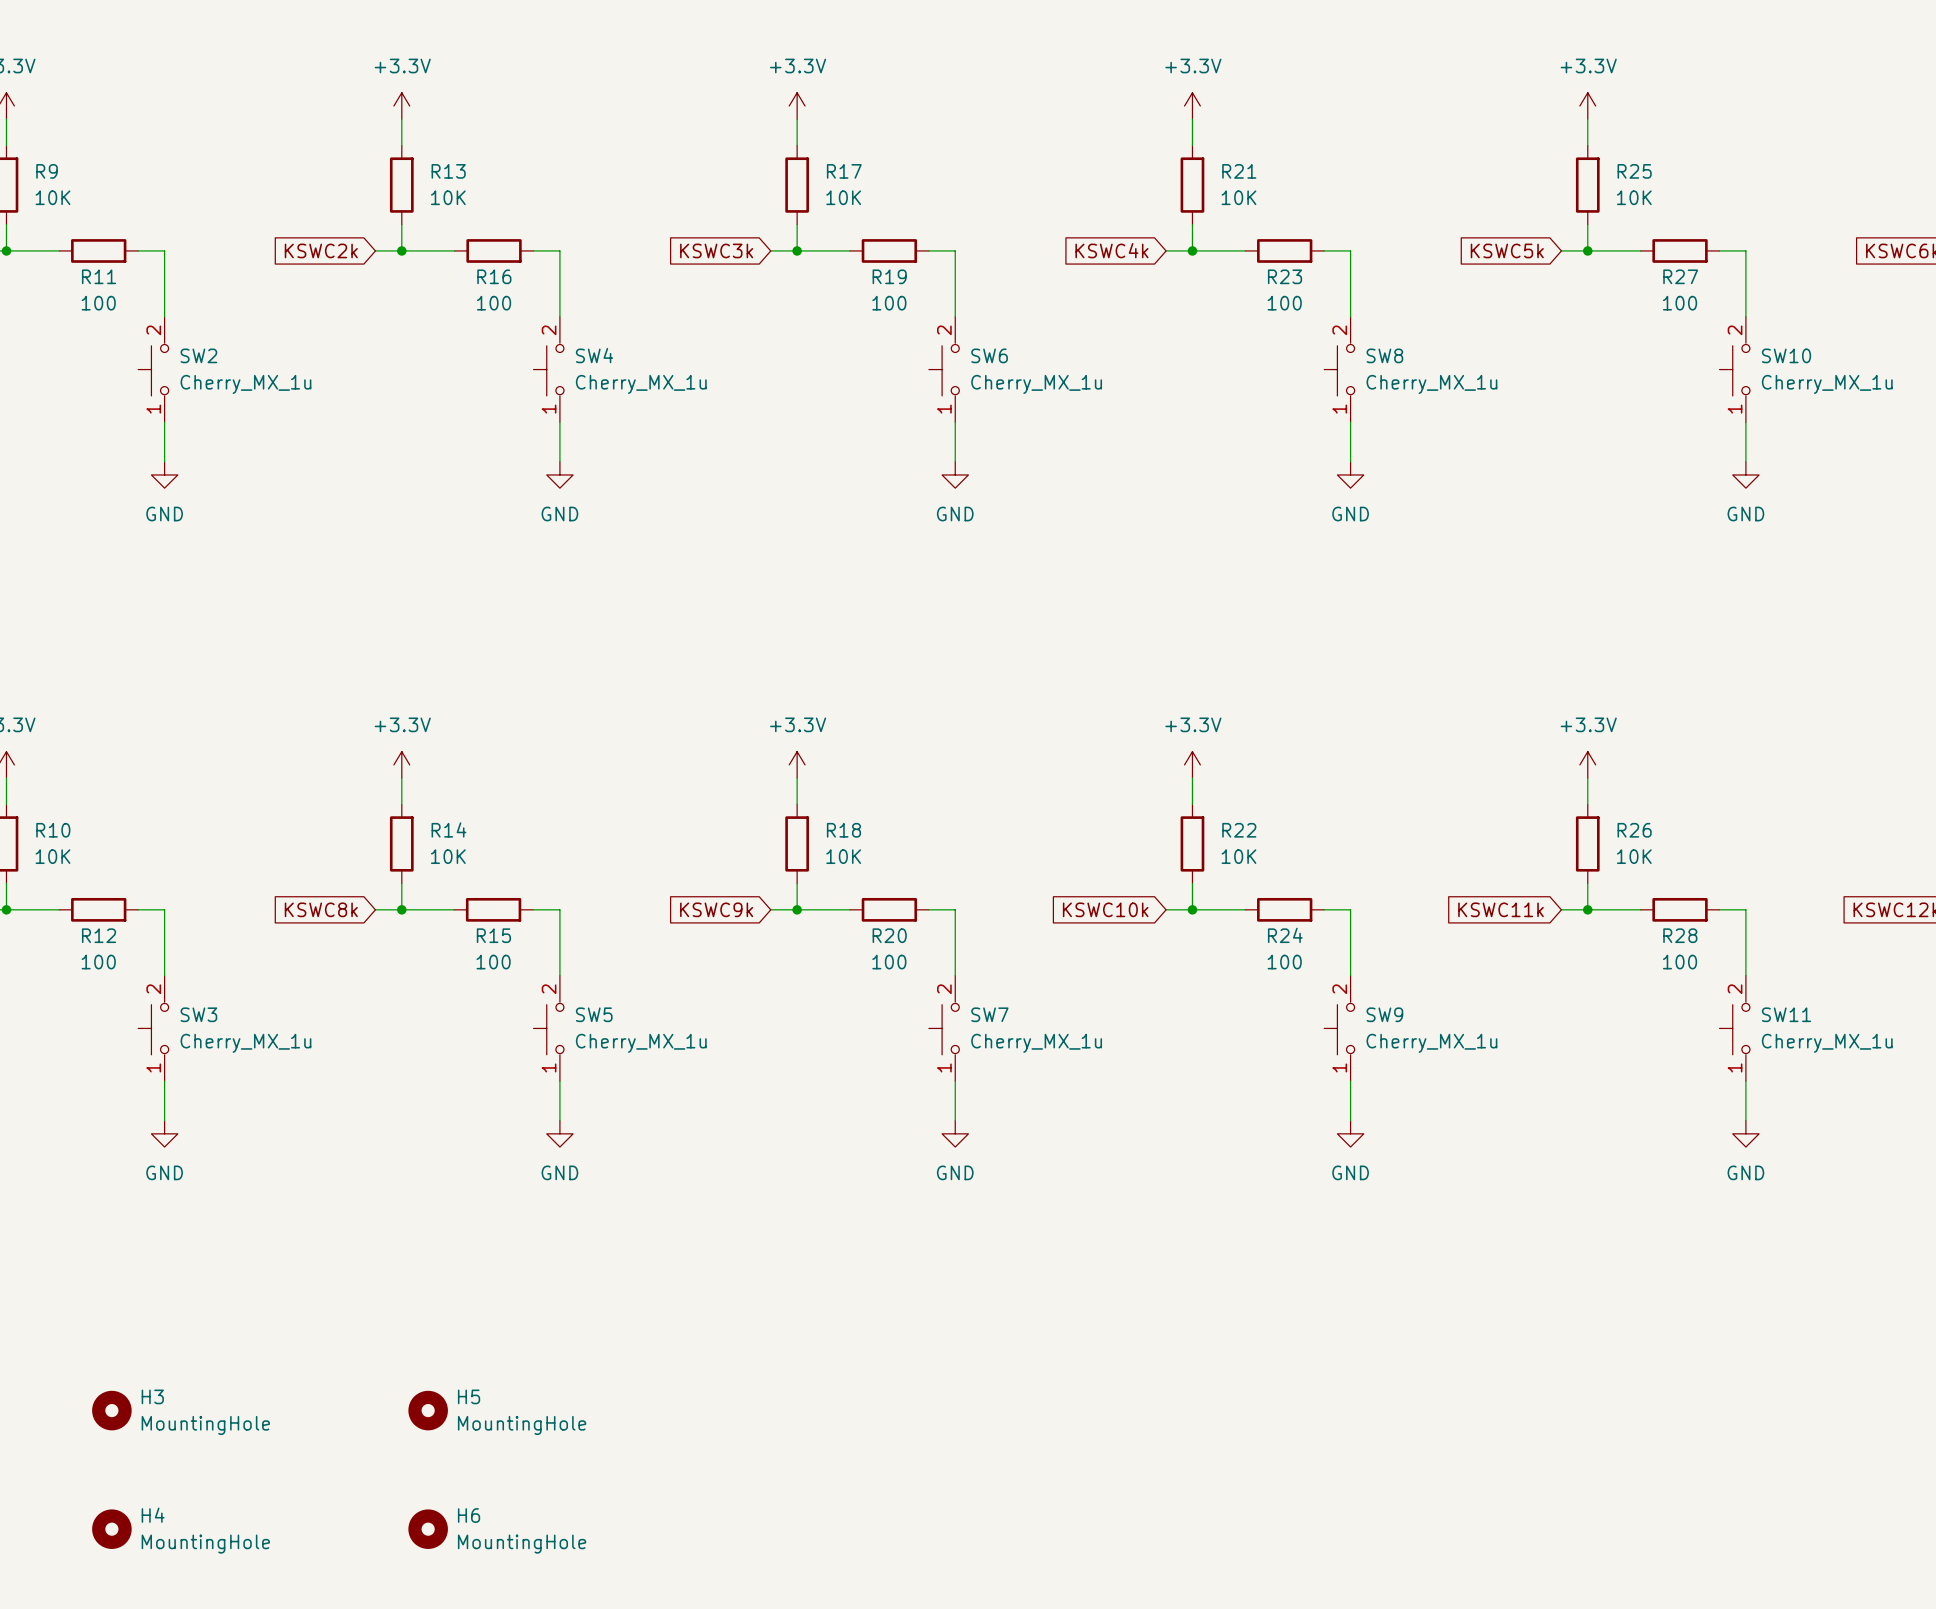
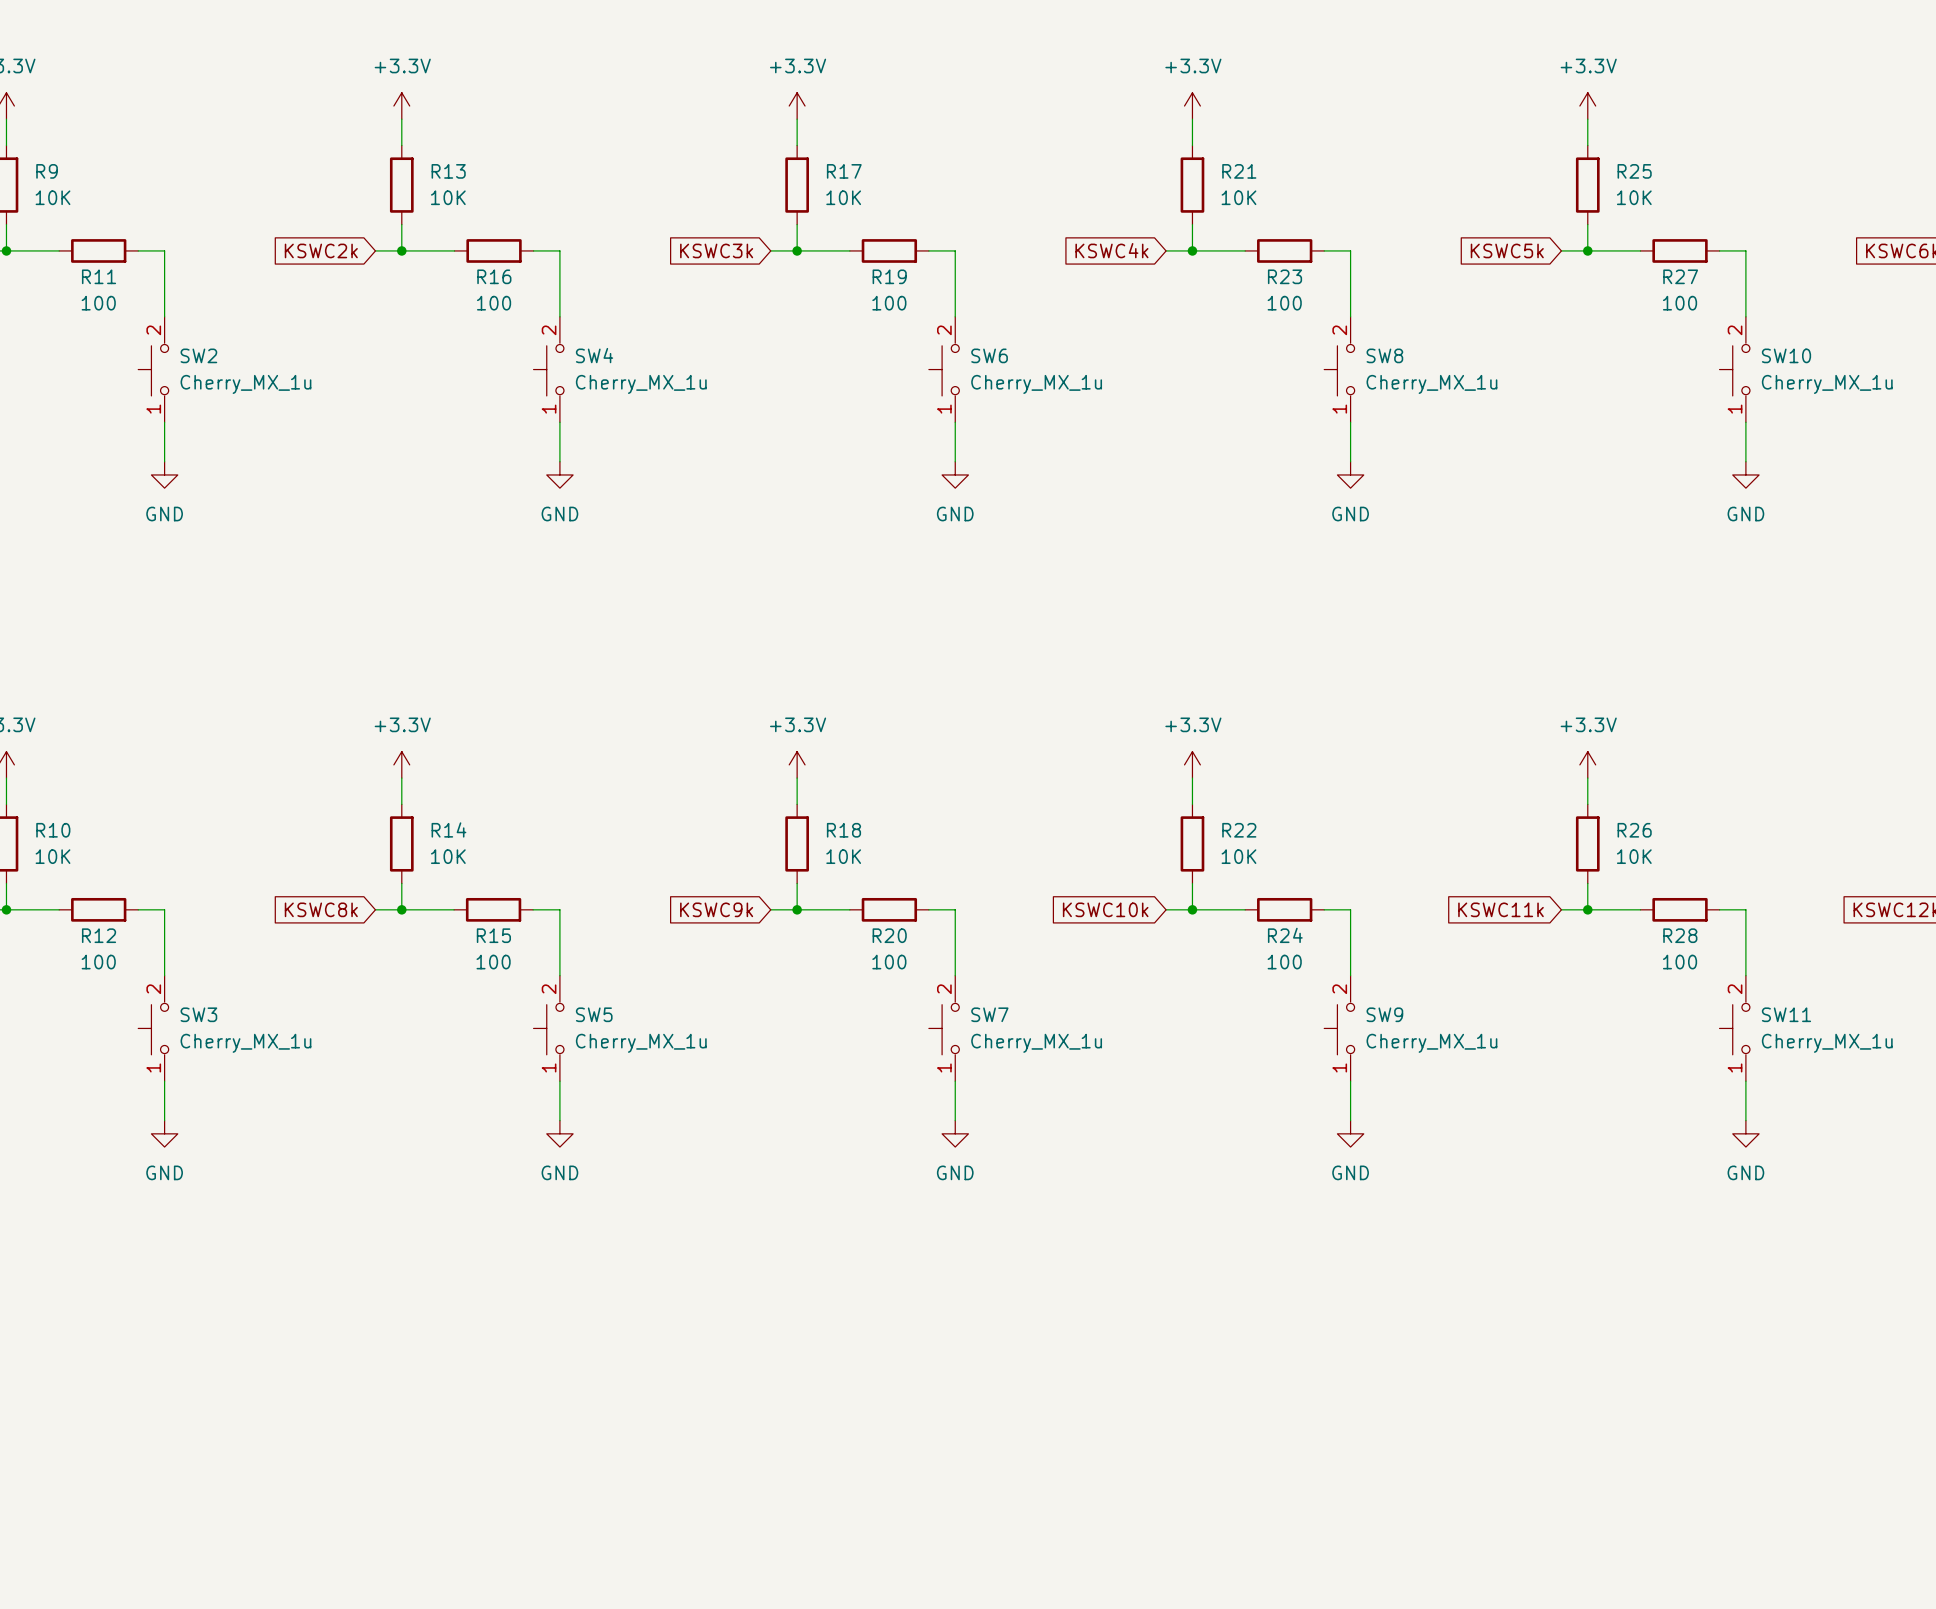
H3: MountingHole (111, 1410) -> none
H5: MountingHole (428, 1410) -> none
H4: MountingHole (111, 1529) -> none
H6: MountingHole (428, 1529) -> none

